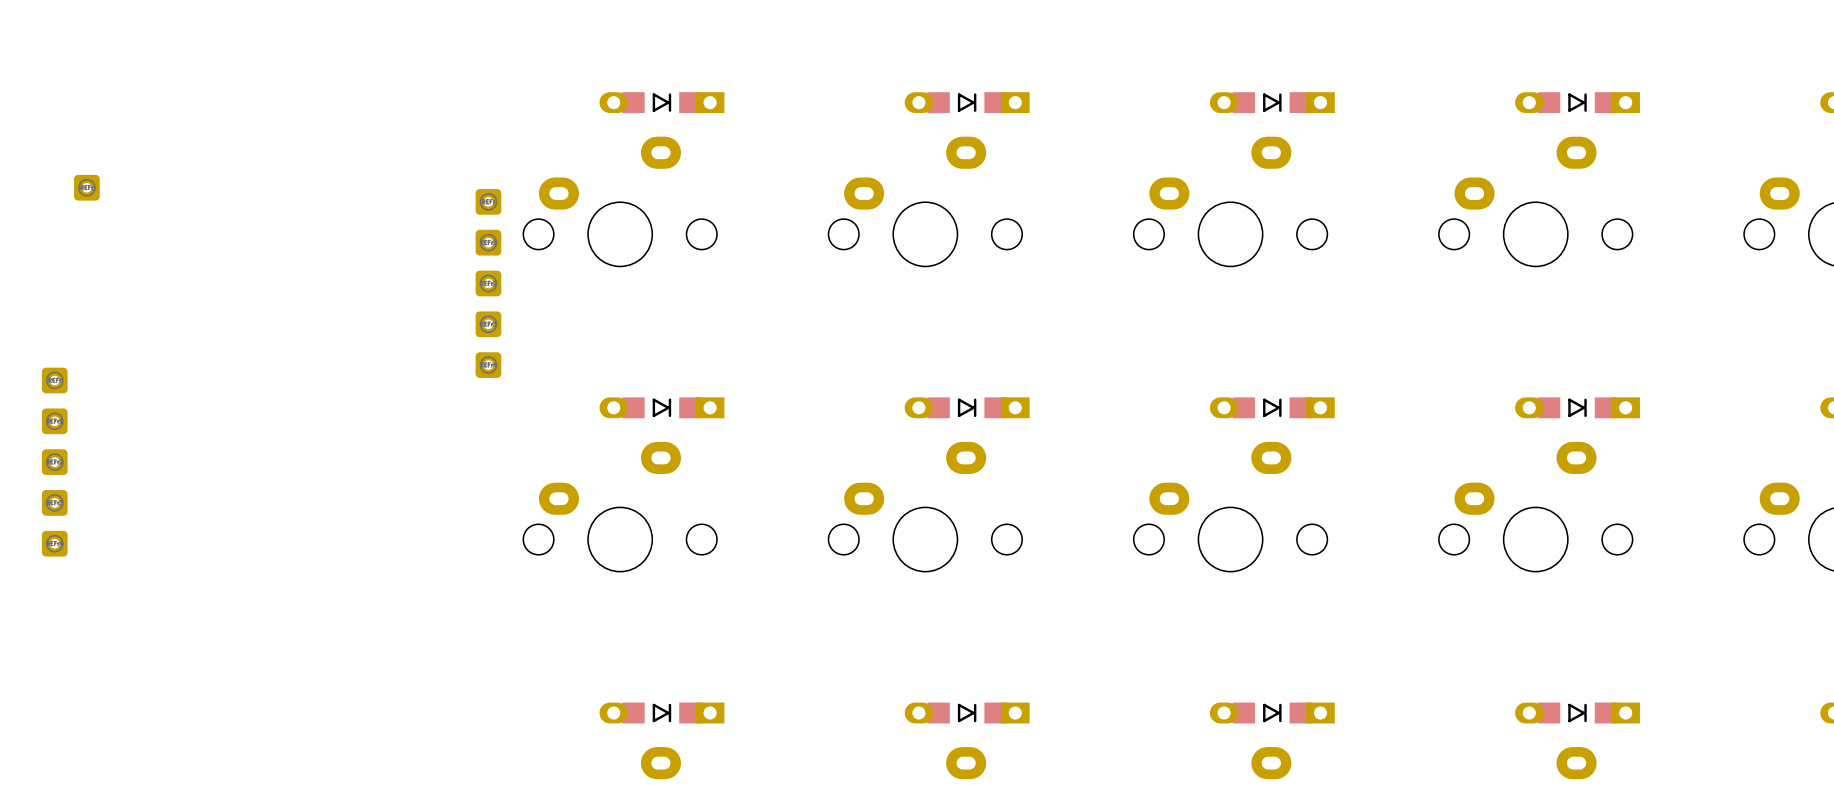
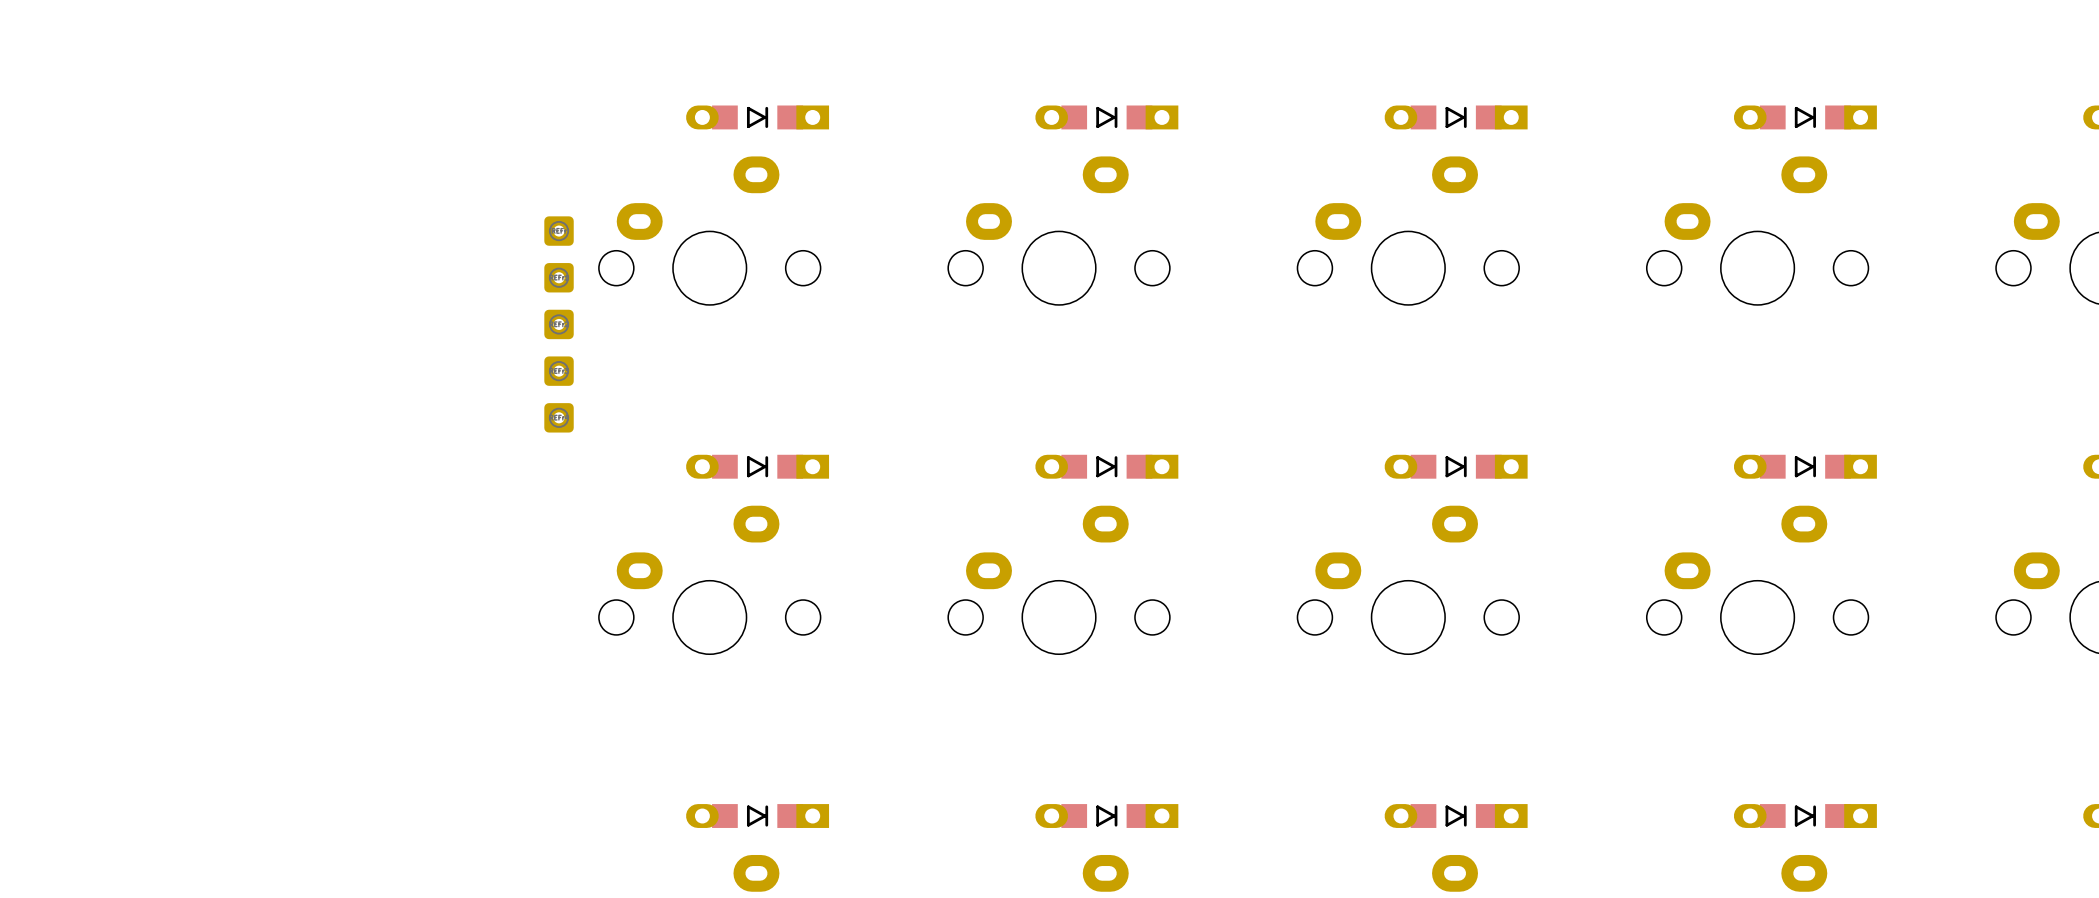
part: (86, 187) -> none
part: (54, 380) -> none
part: (54, 421) -> none
part: (54, 462) -> none
part: (54, 502) -> none
part: (54, 543) -> none

